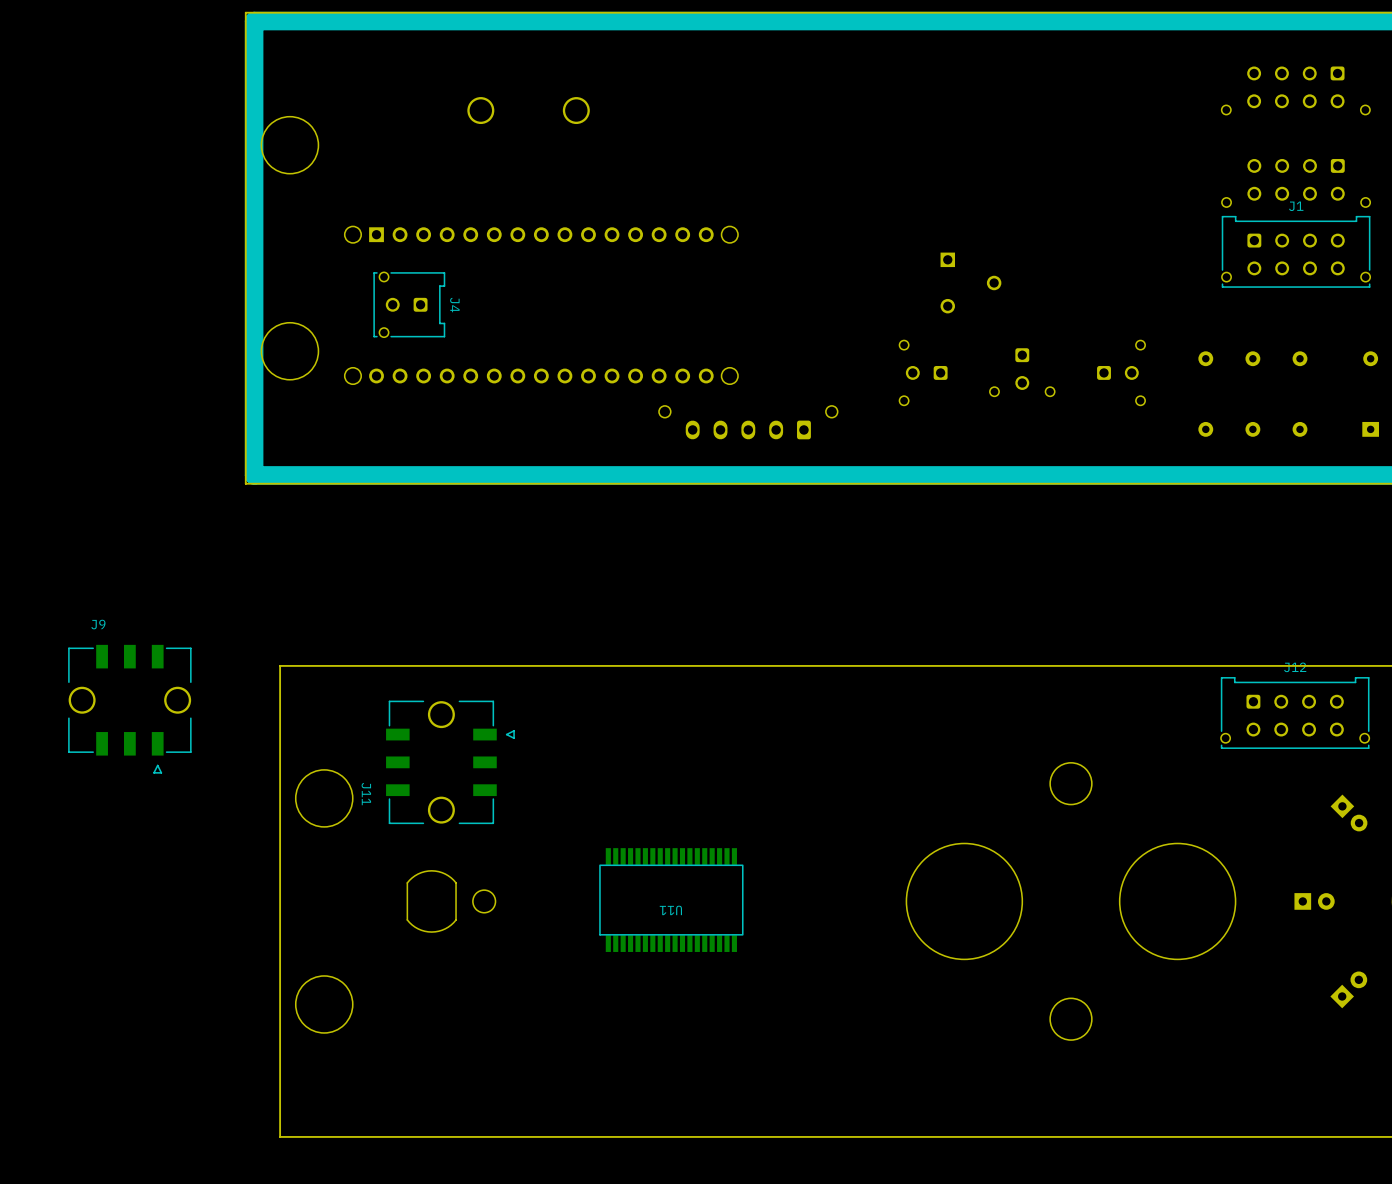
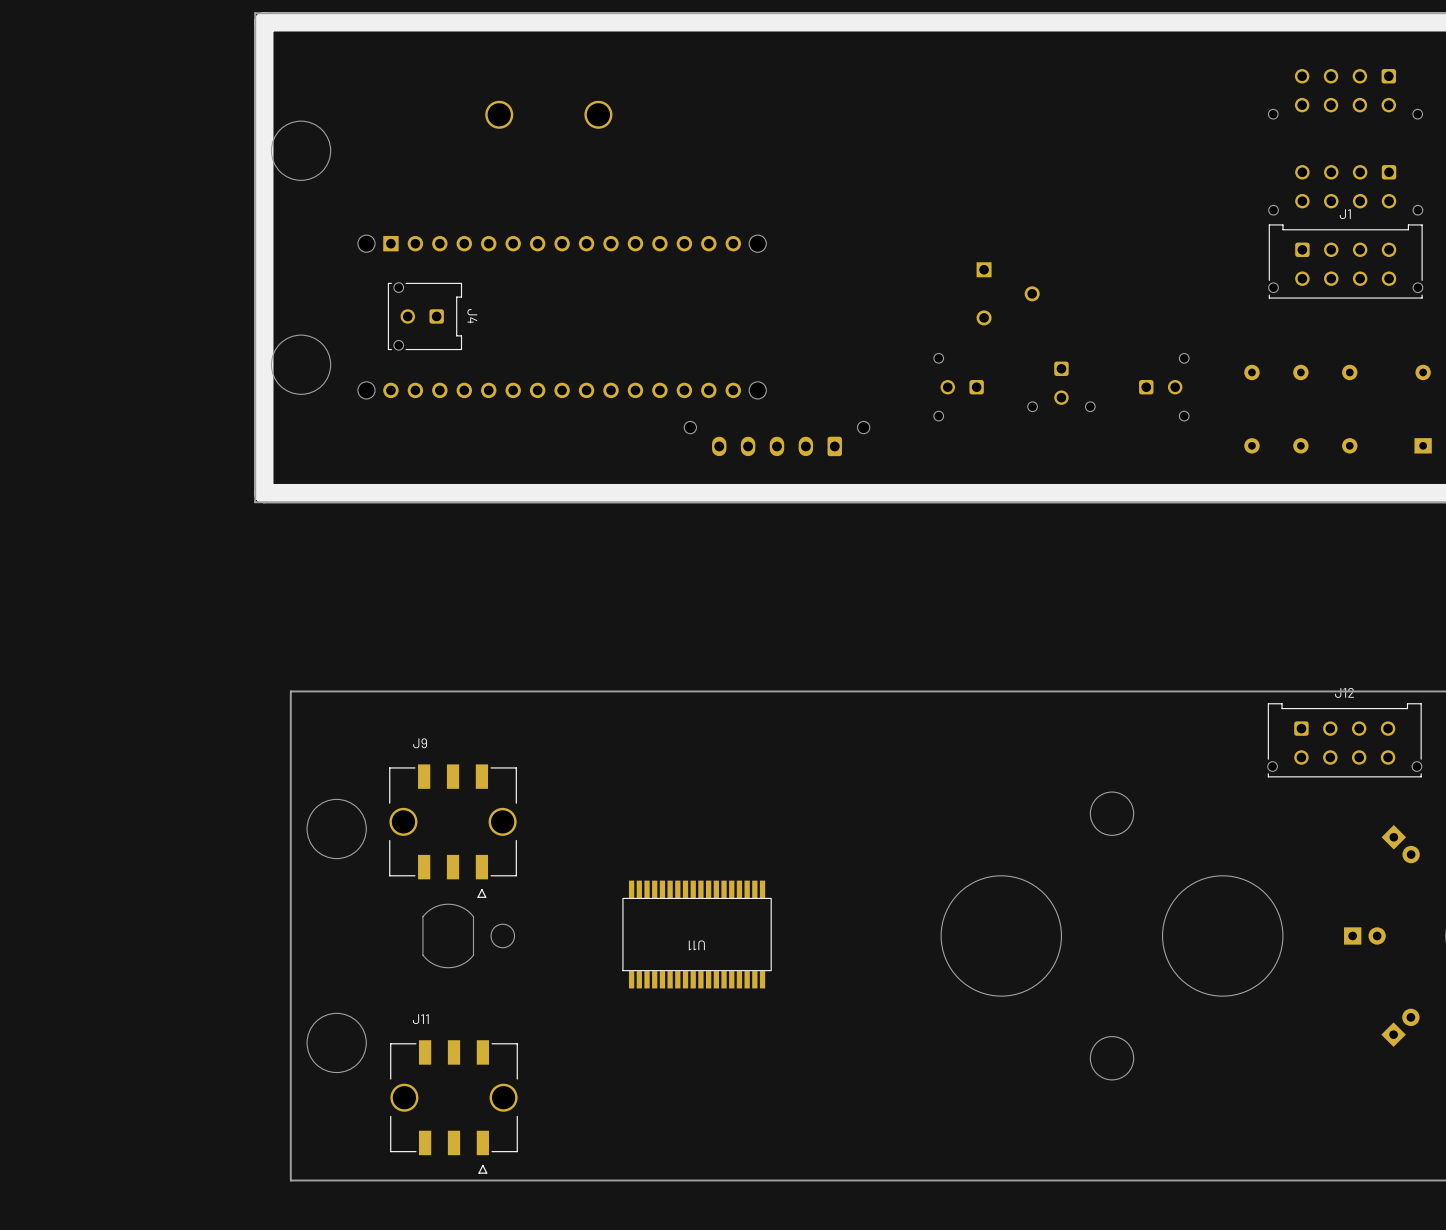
J9 position: (129, 709) -> (453, 831)
J11 rotation: 0° (450, 762) -> 90° clockwise (453, 1106)
J11 position: (450, 762) -> (453, 1106)

